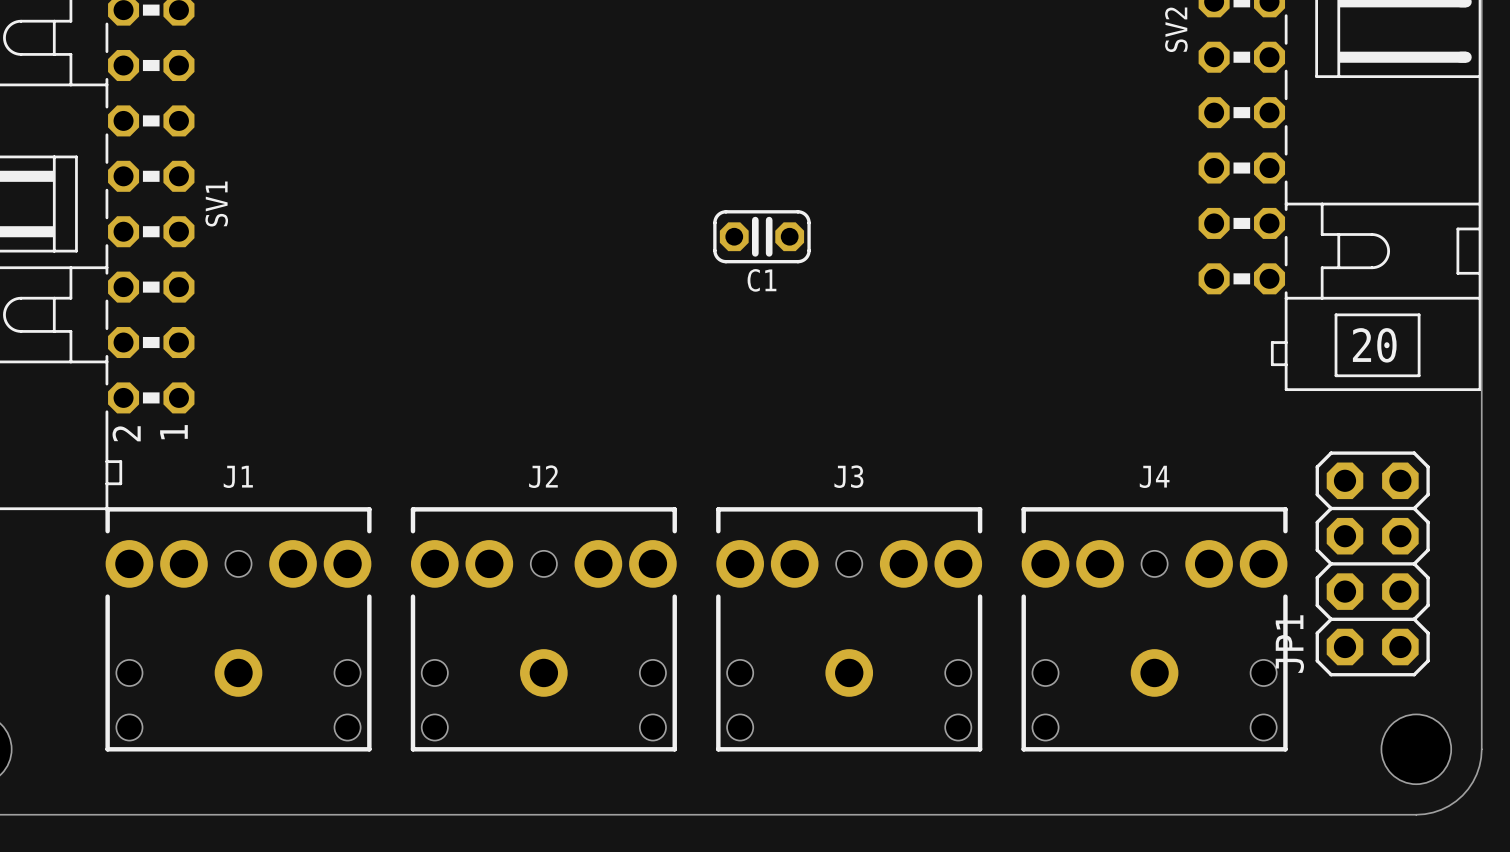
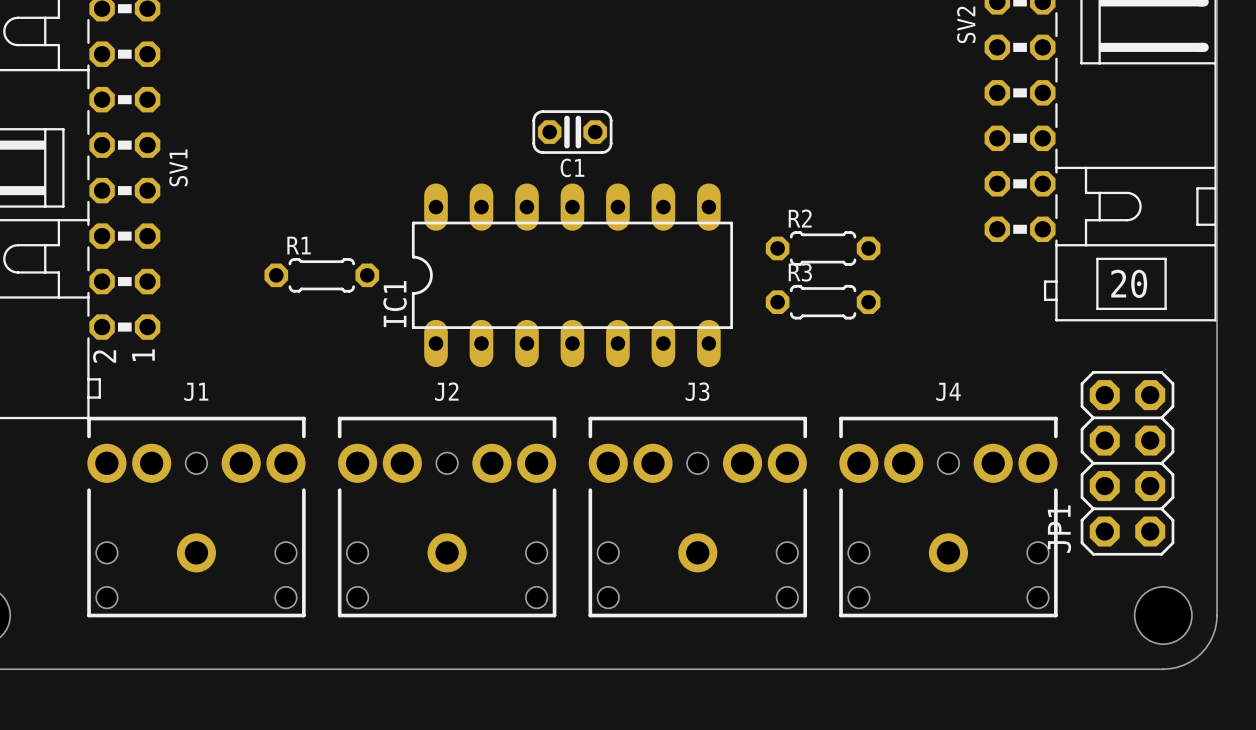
C1 position: (761, 236) -> (572, 132)
R2: none -> (823, 248)
R1: none -> (321, 275)
IC1: none -> (572, 275)
R3: none -> (823, 302)

